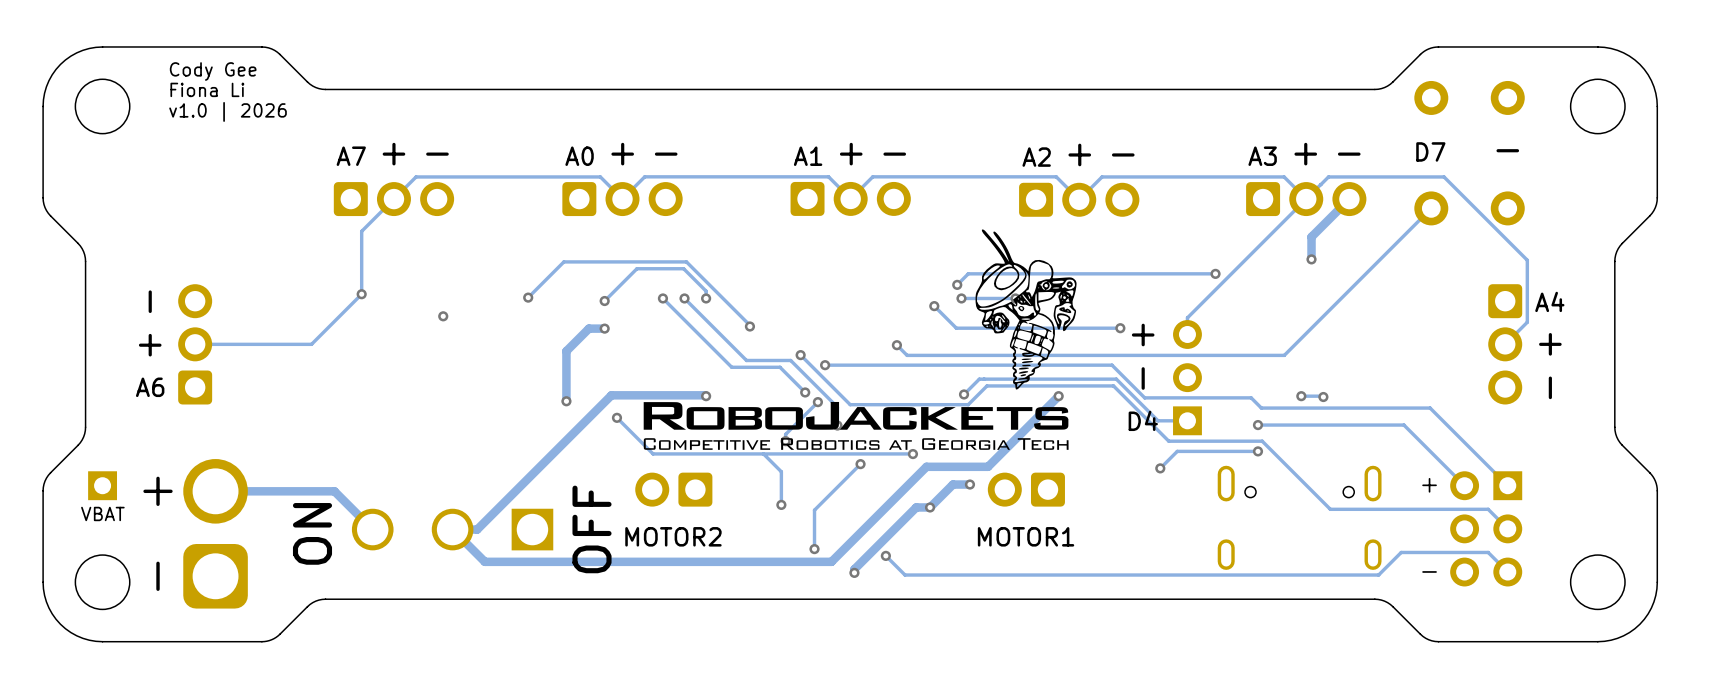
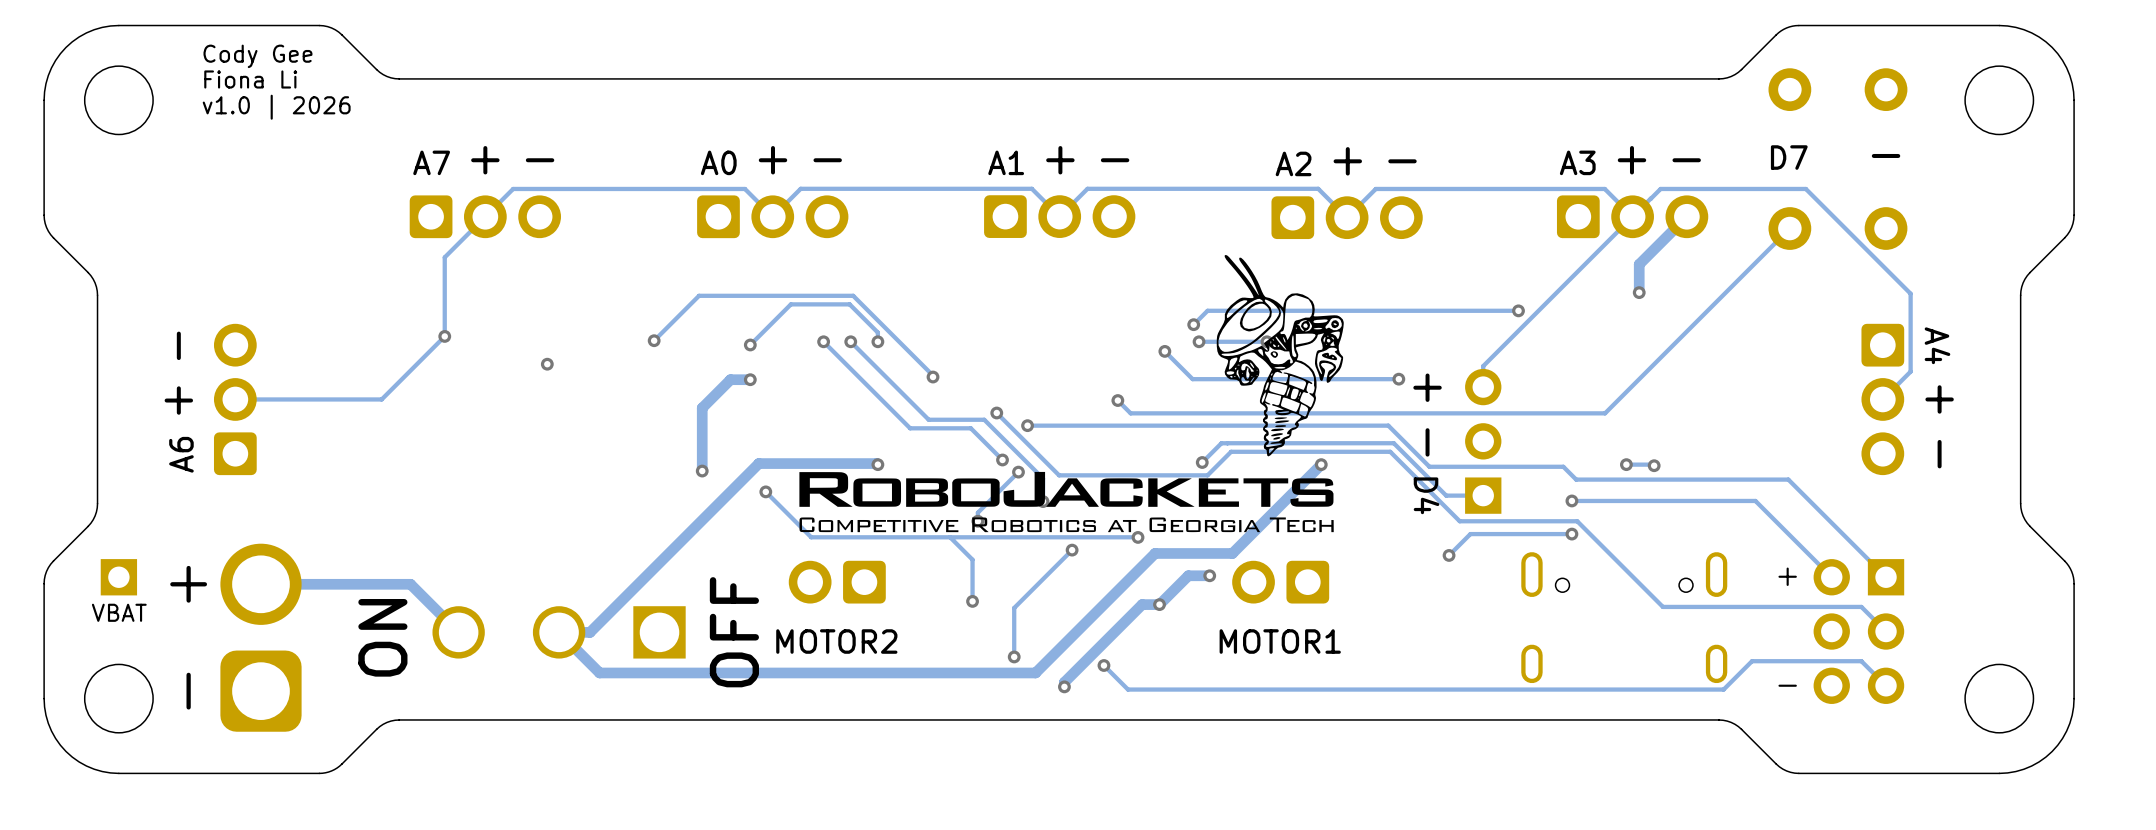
text rotation: 0° (1549, 301) -> 90° clockwise (1937, 345)
text rotation: 0° (150, 387) -> 90° counterclockwise (181, 454)
text rotation: 0° (1143, 420) -> 90° clockwise (1426, 495)

